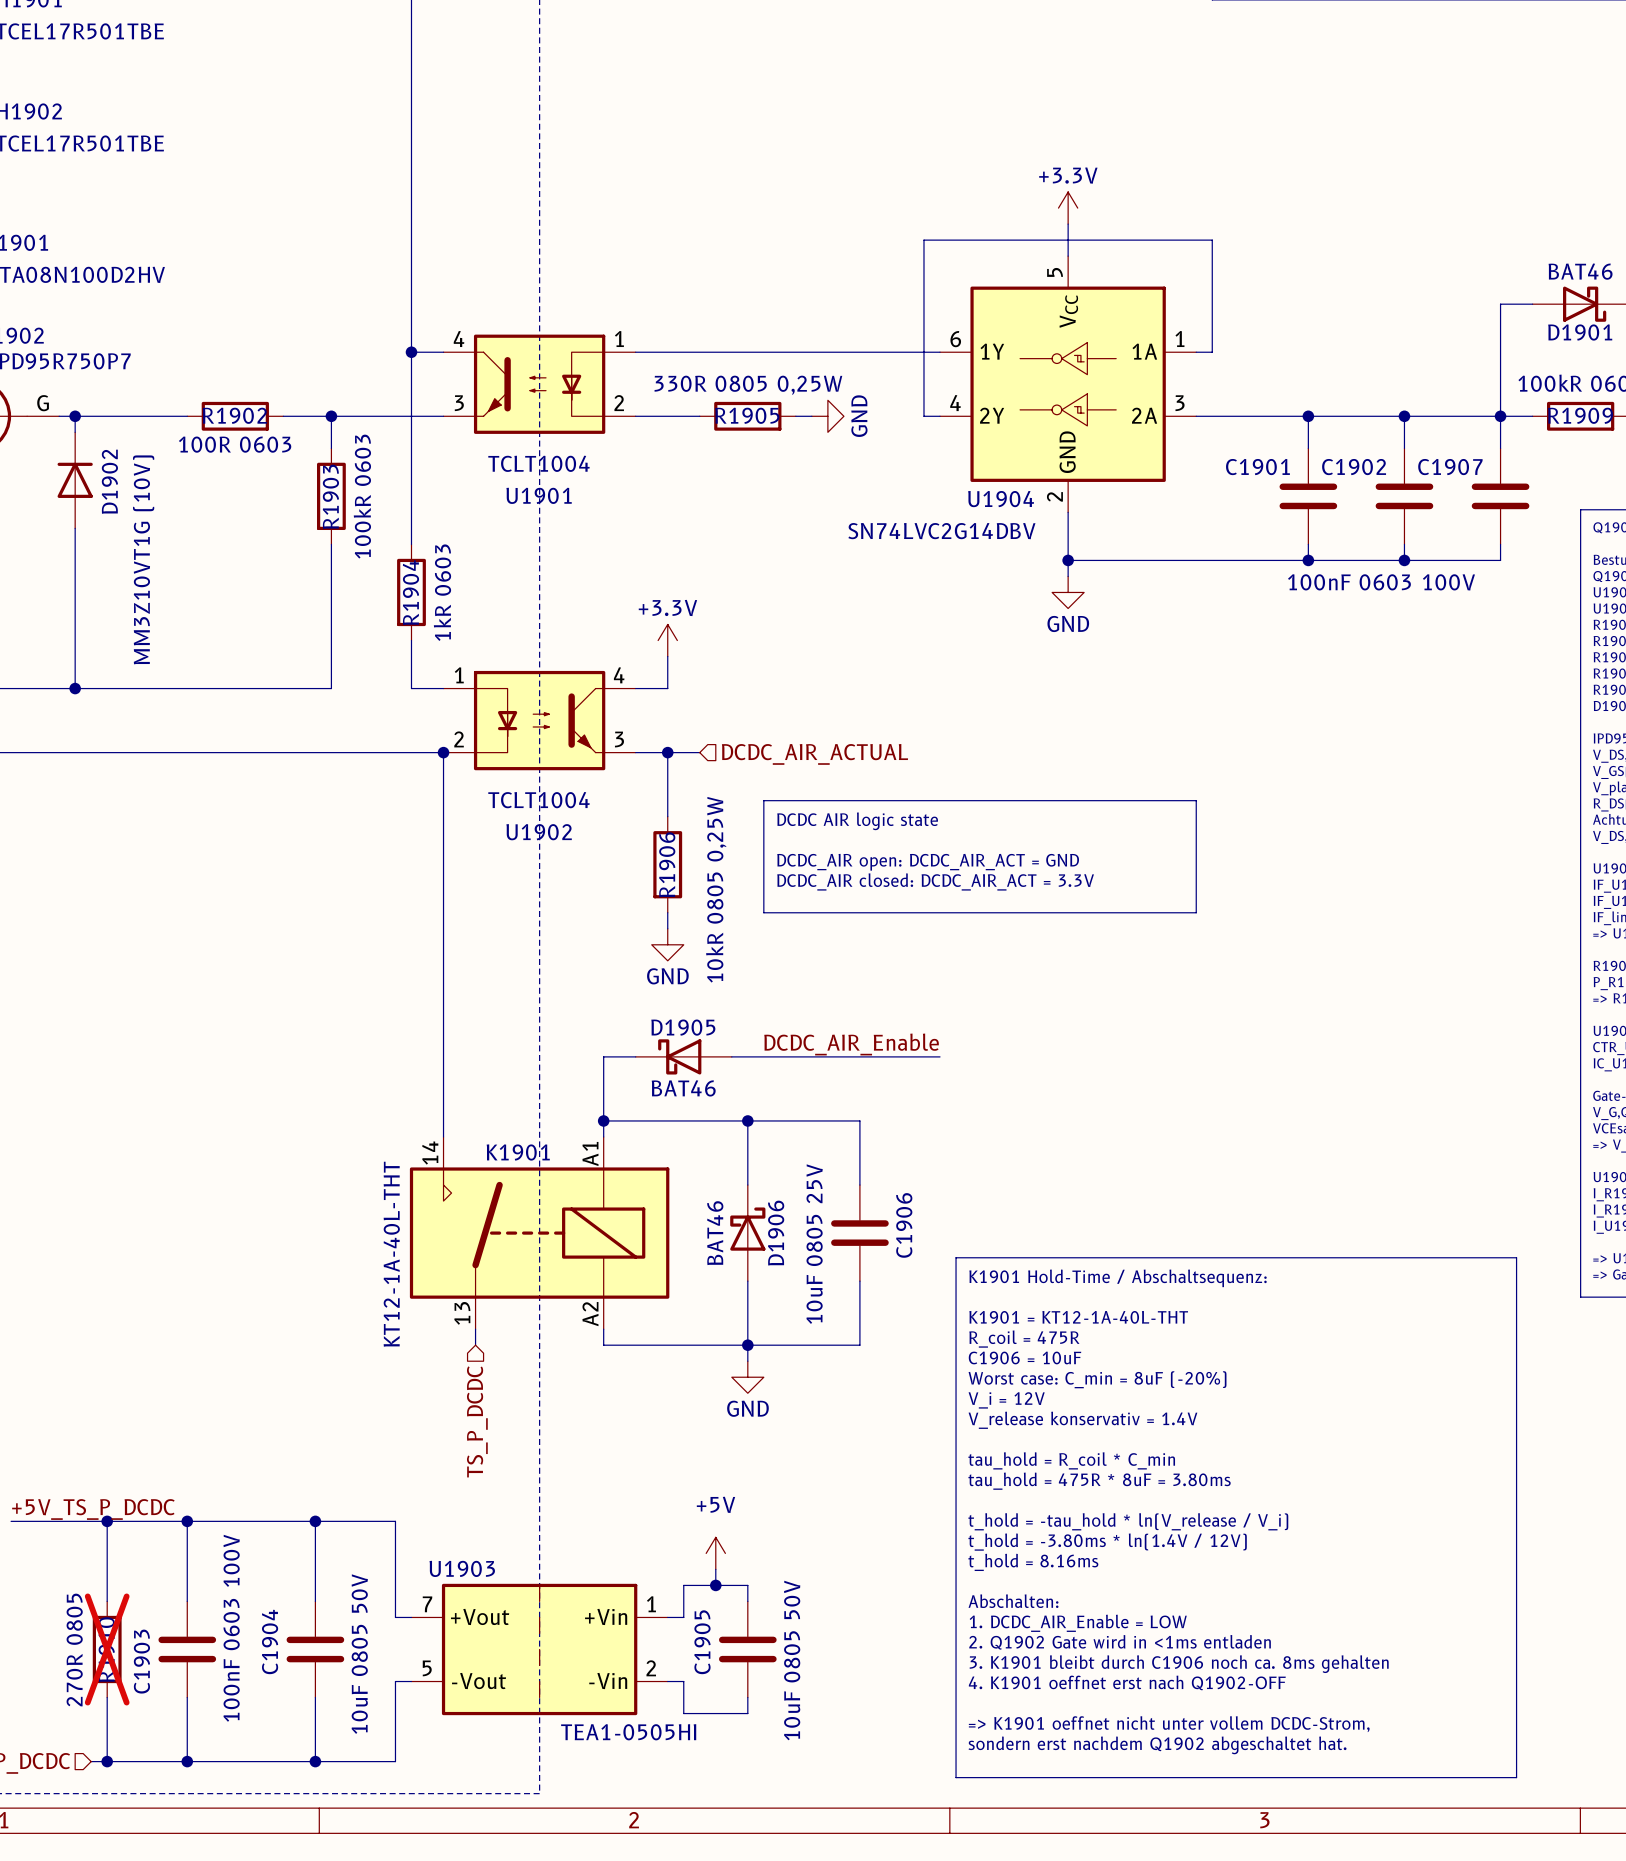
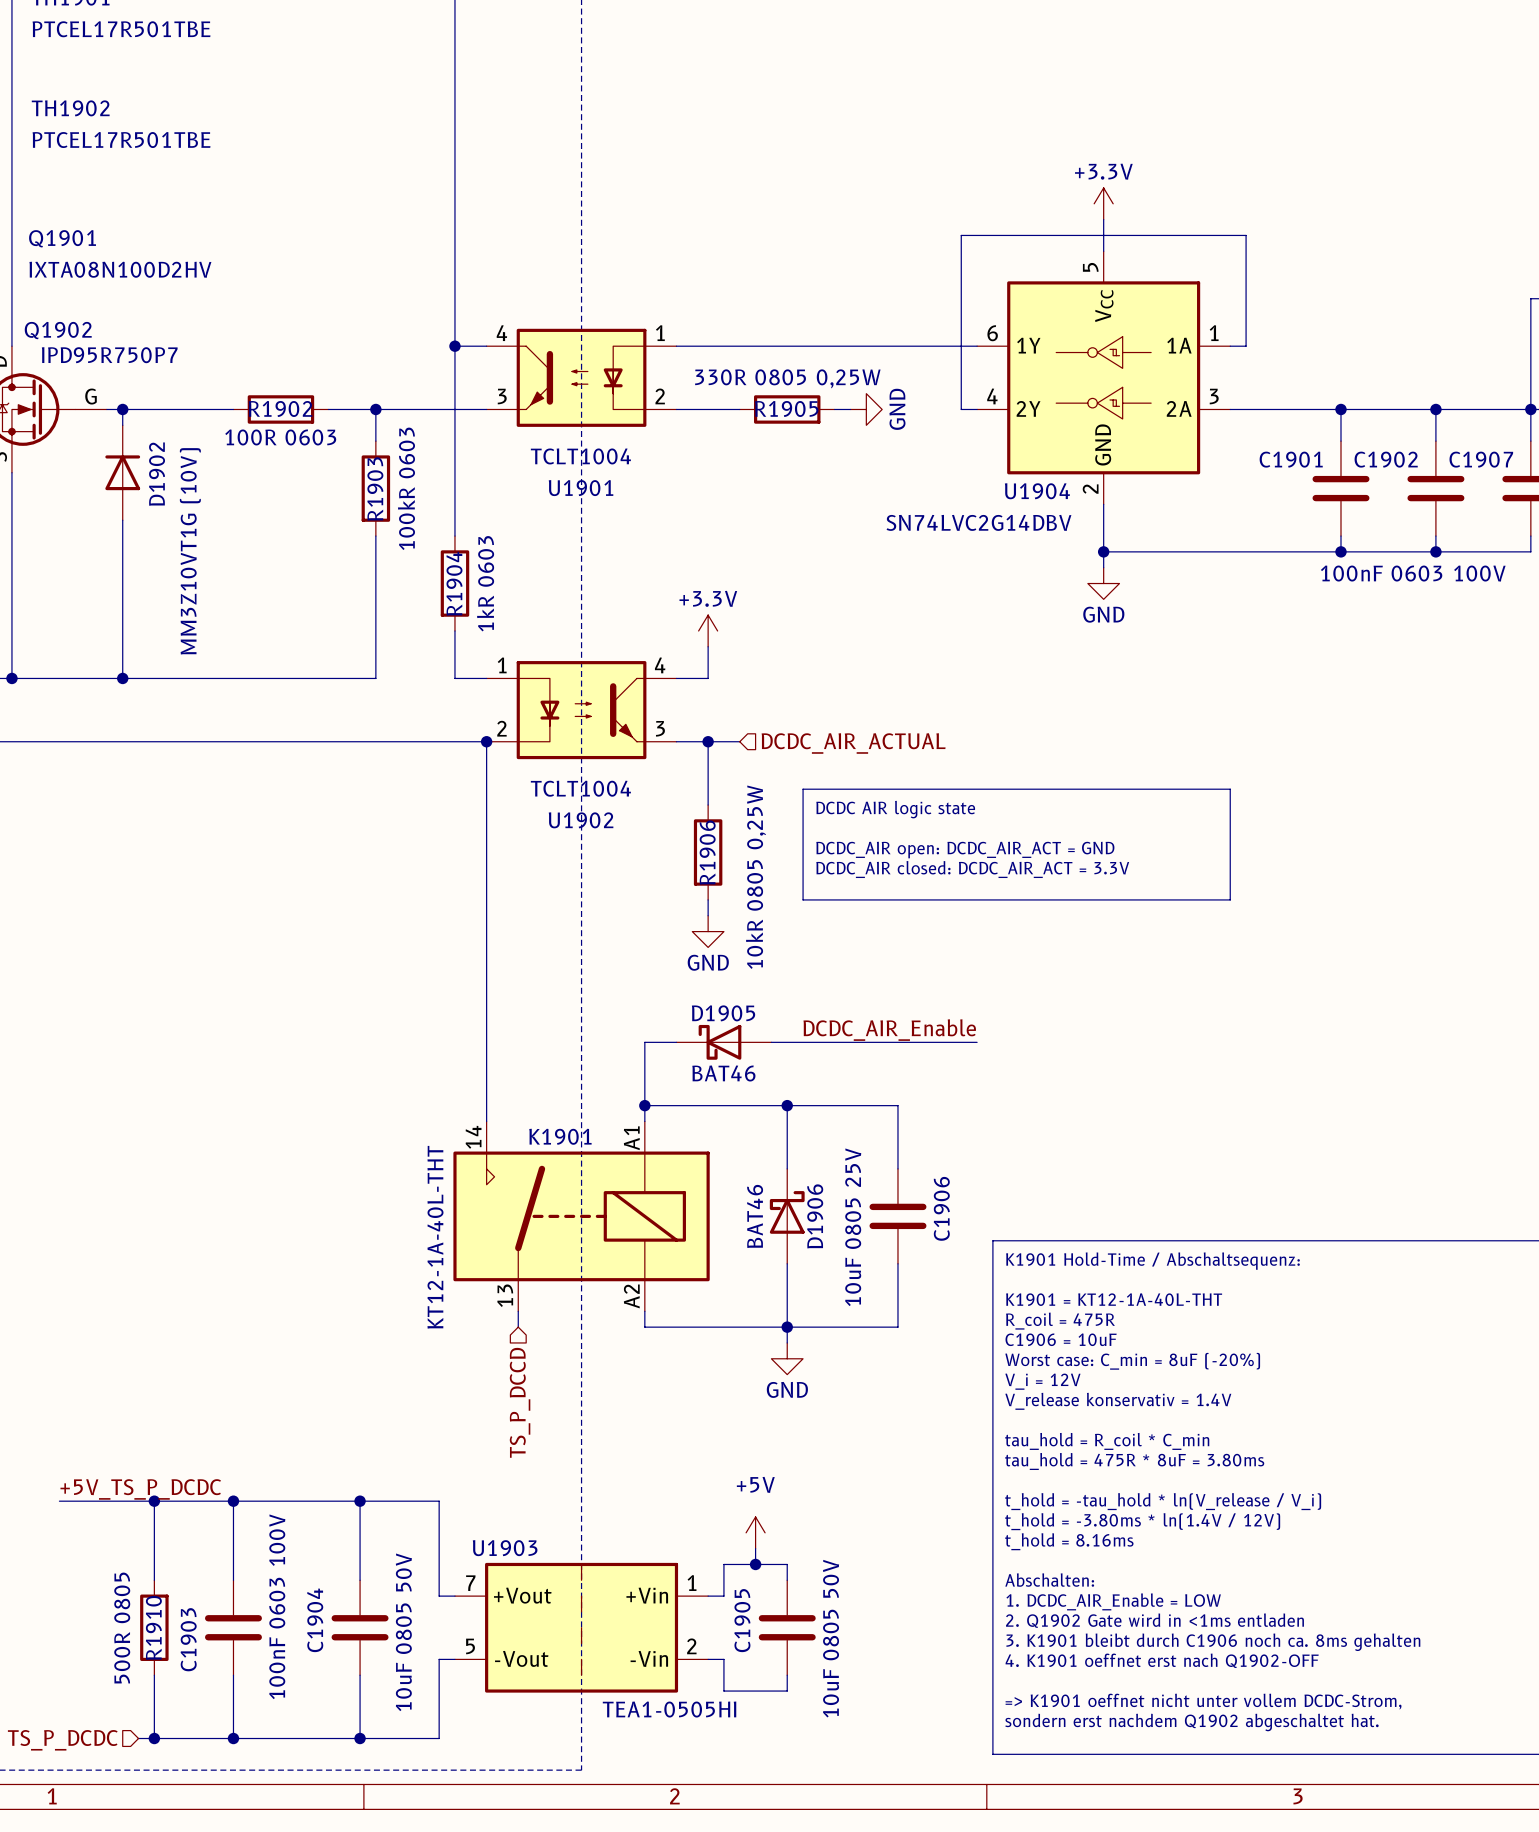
hierarchical label: TS_P_DCDC (477, 1421) -> TS_P_DCCD (520, 1402)
R1910 do-not-place cross: (107, 1649) -> none
R1910 value: 270R 0805 (74, 1650) -> 500R 0805 (122, 1628)

